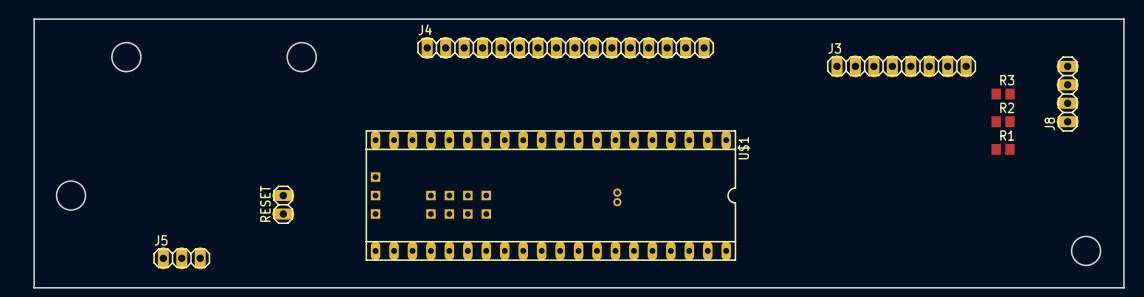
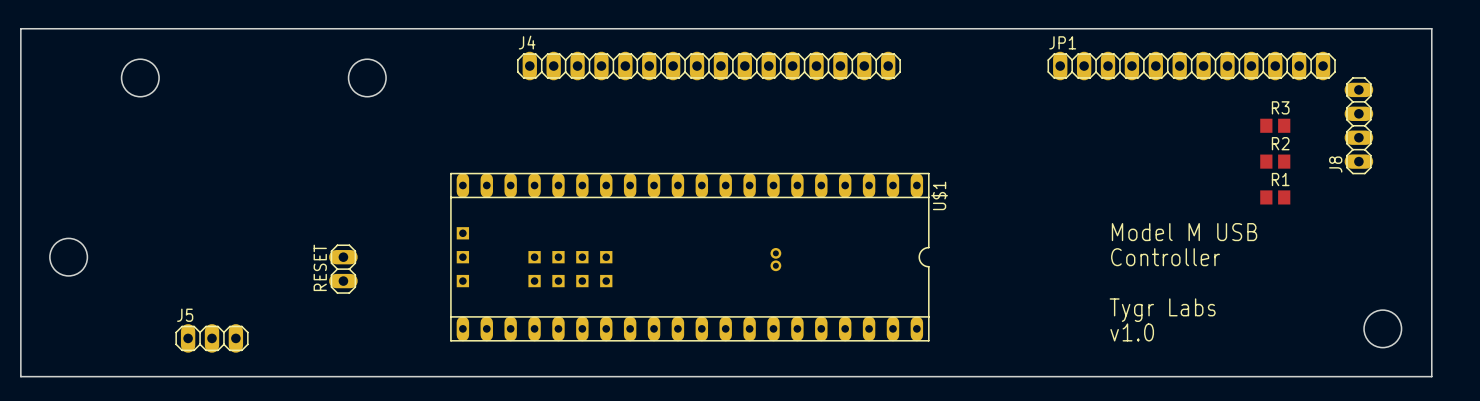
JP1: none -> (1191, 66)
J3: (901, 66) -> none
text: none -> Model M USB (1184, 232)
text: none -> Controller (1165, 257)
text: none -> Tygr Labs (1162, 310)
text: none -> v1.0 (1132, 332)

